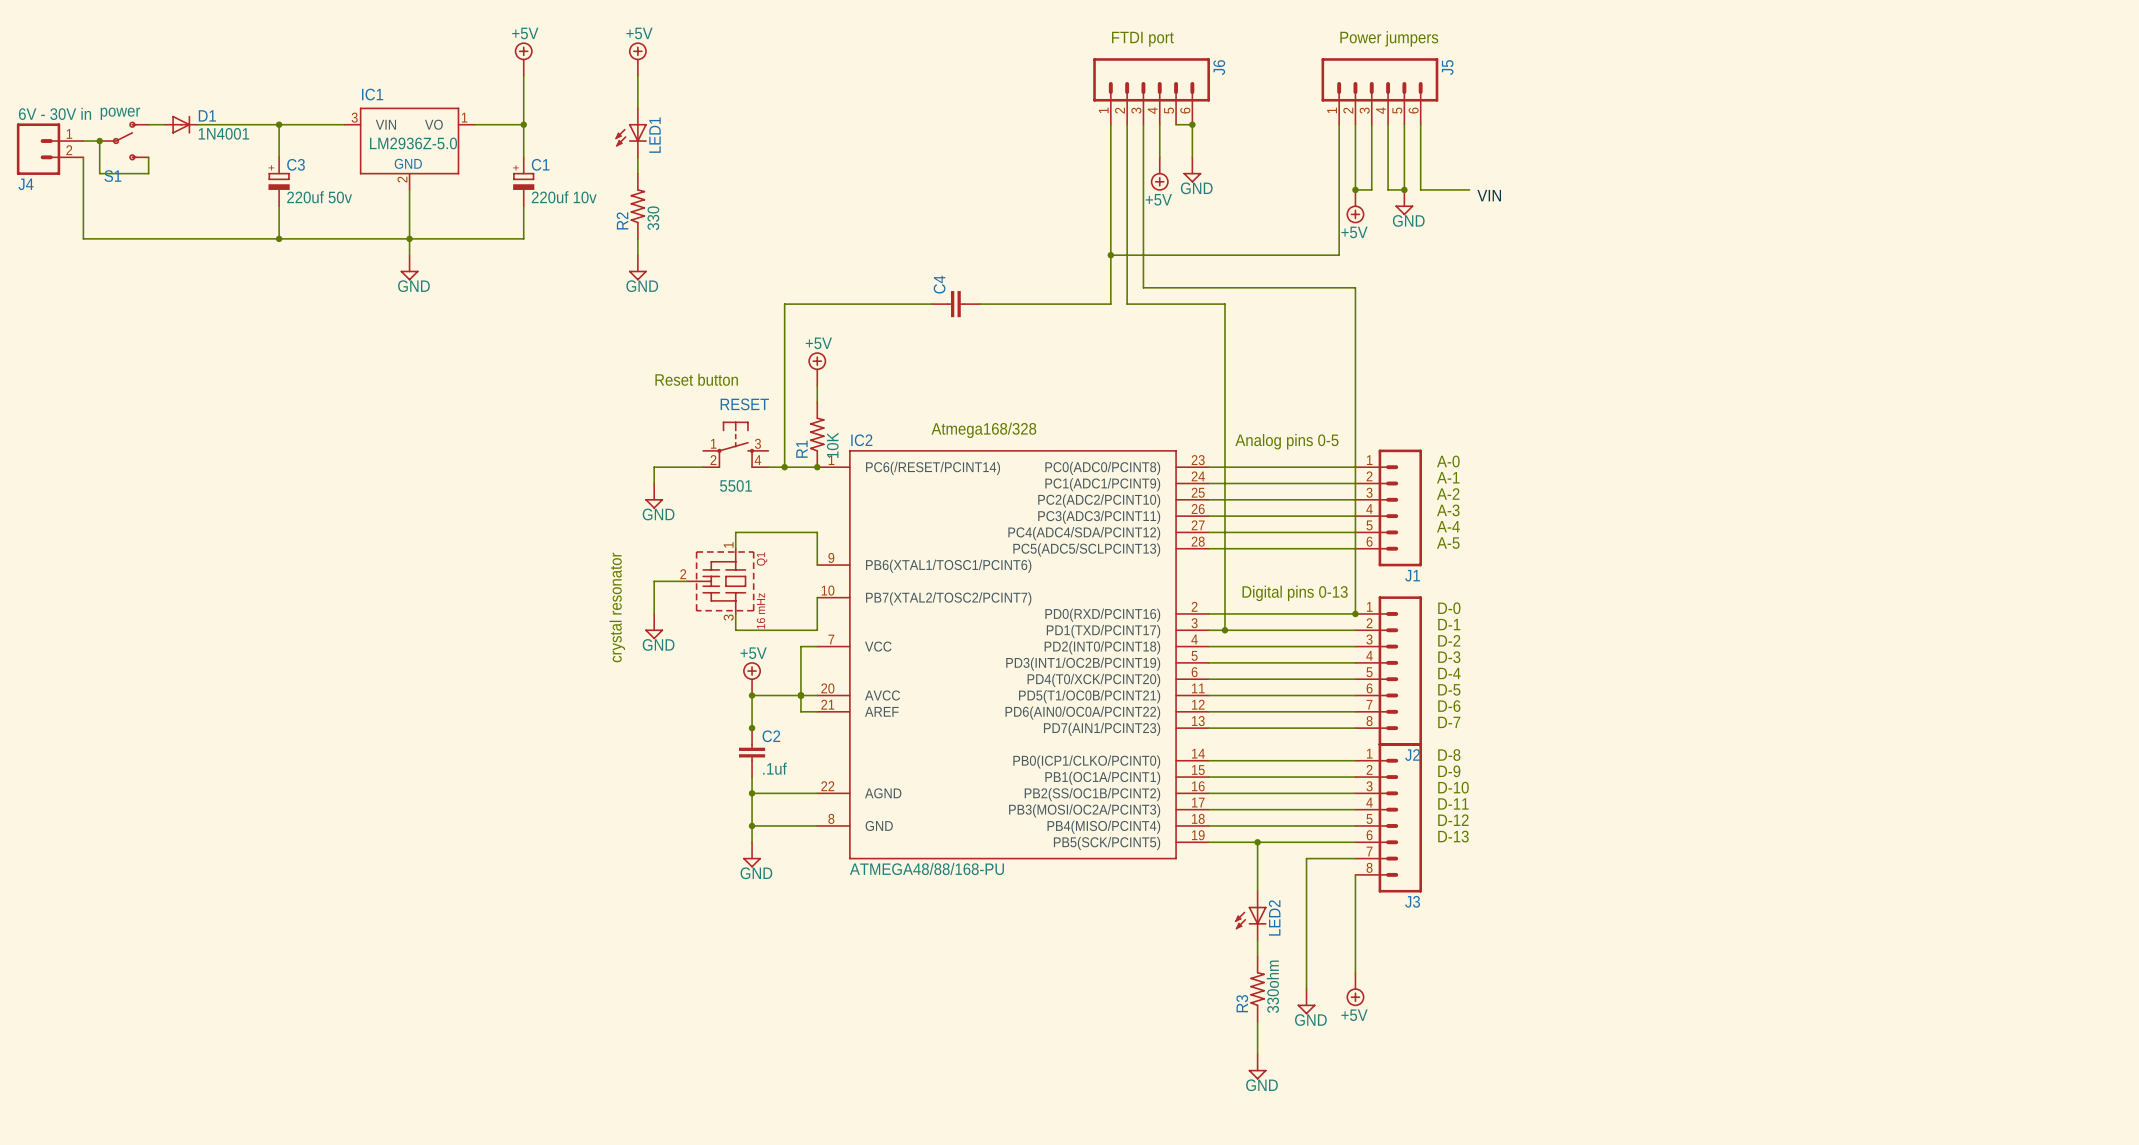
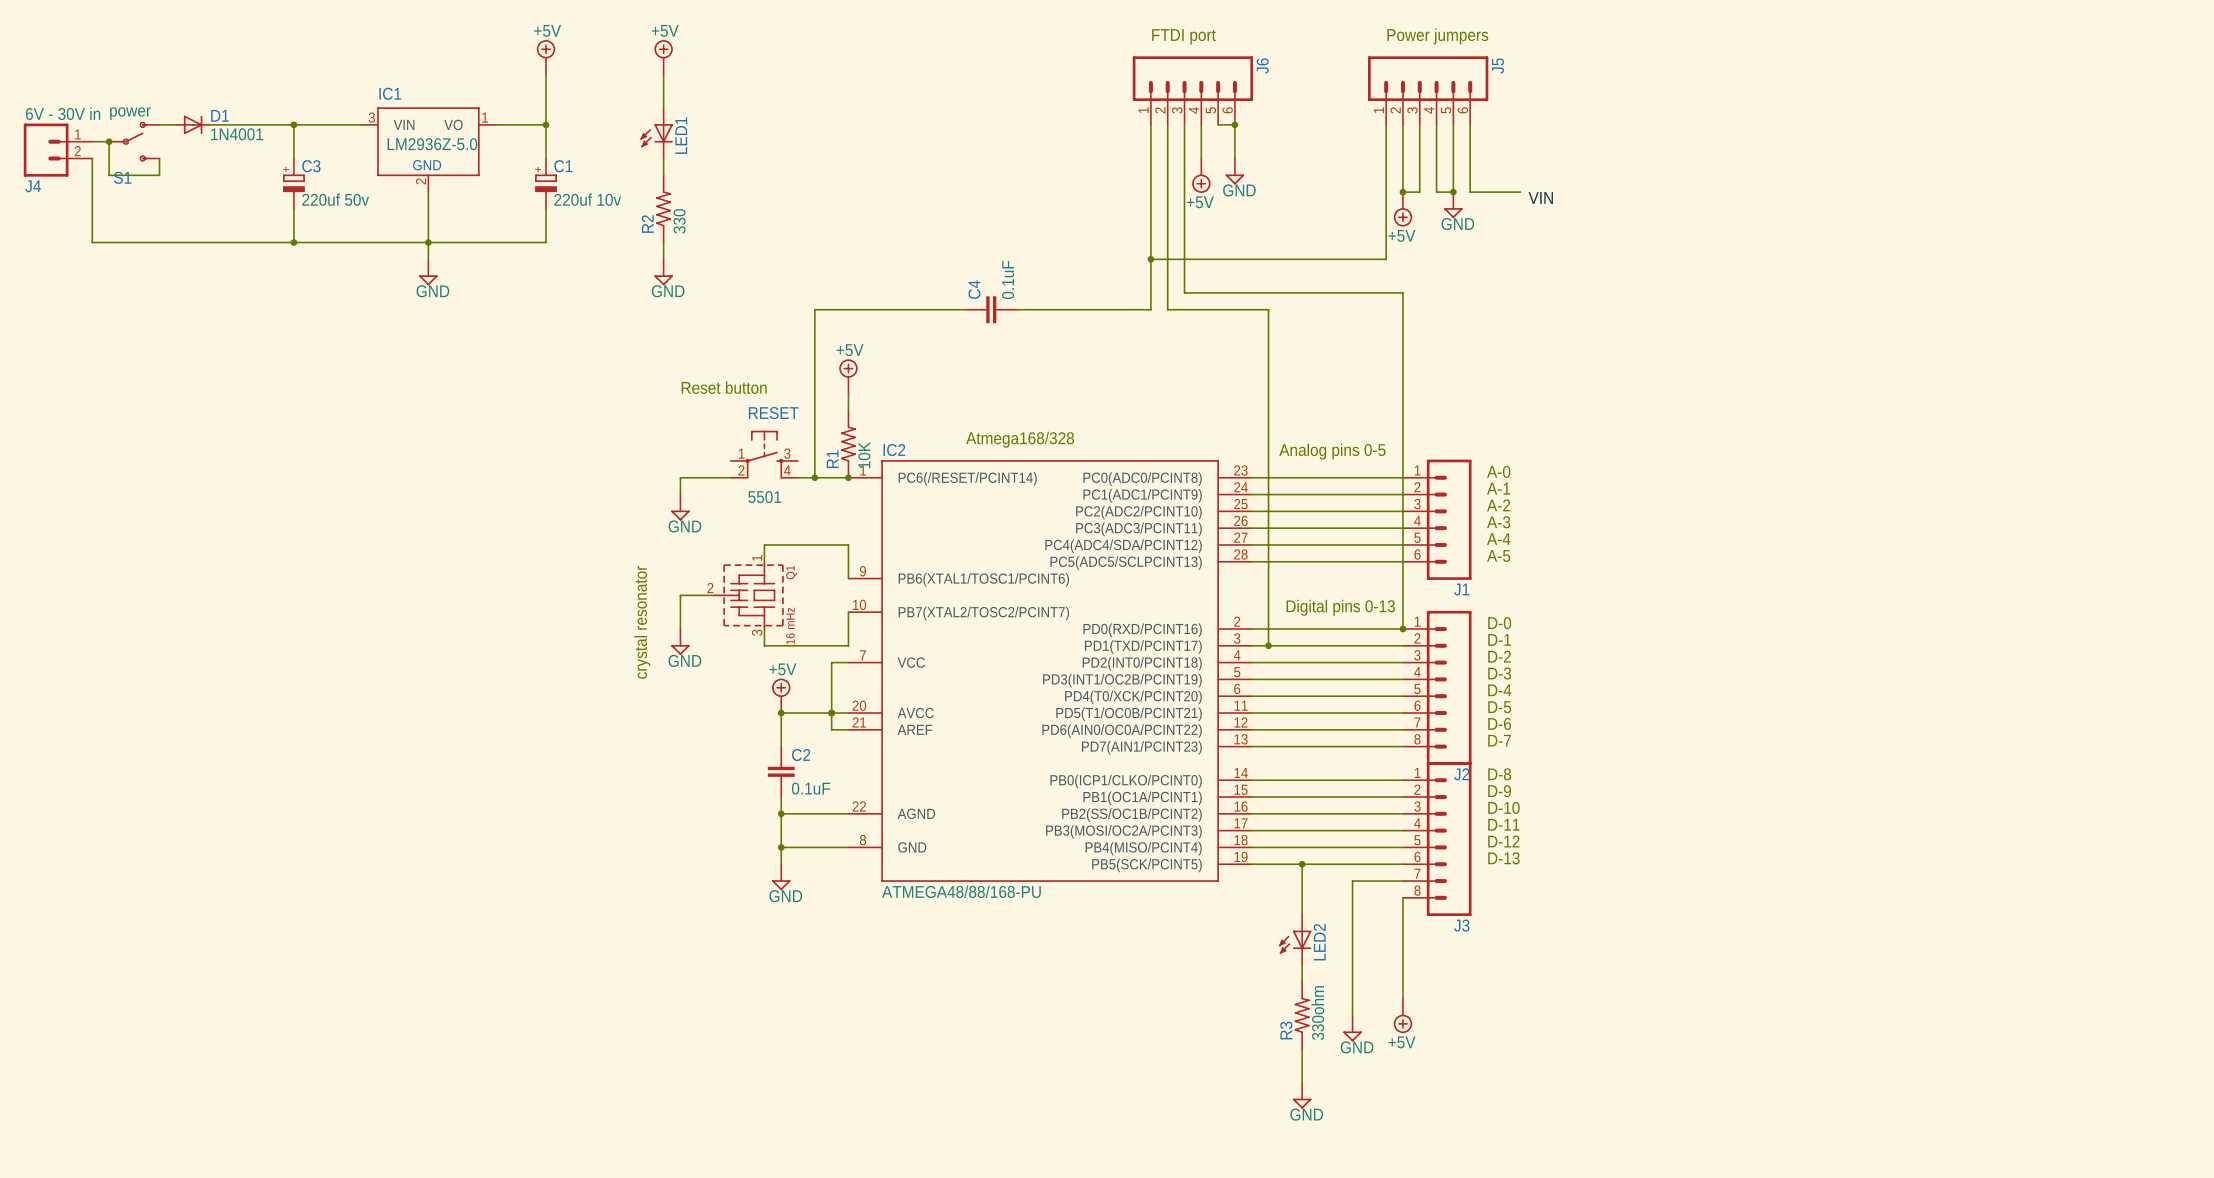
C4 value: none -> 0.1uF (1008, 279)
junction: (752, 728) -> none
C2 value: .1uf (774, 768) -> 0.1uF (810, 788)

